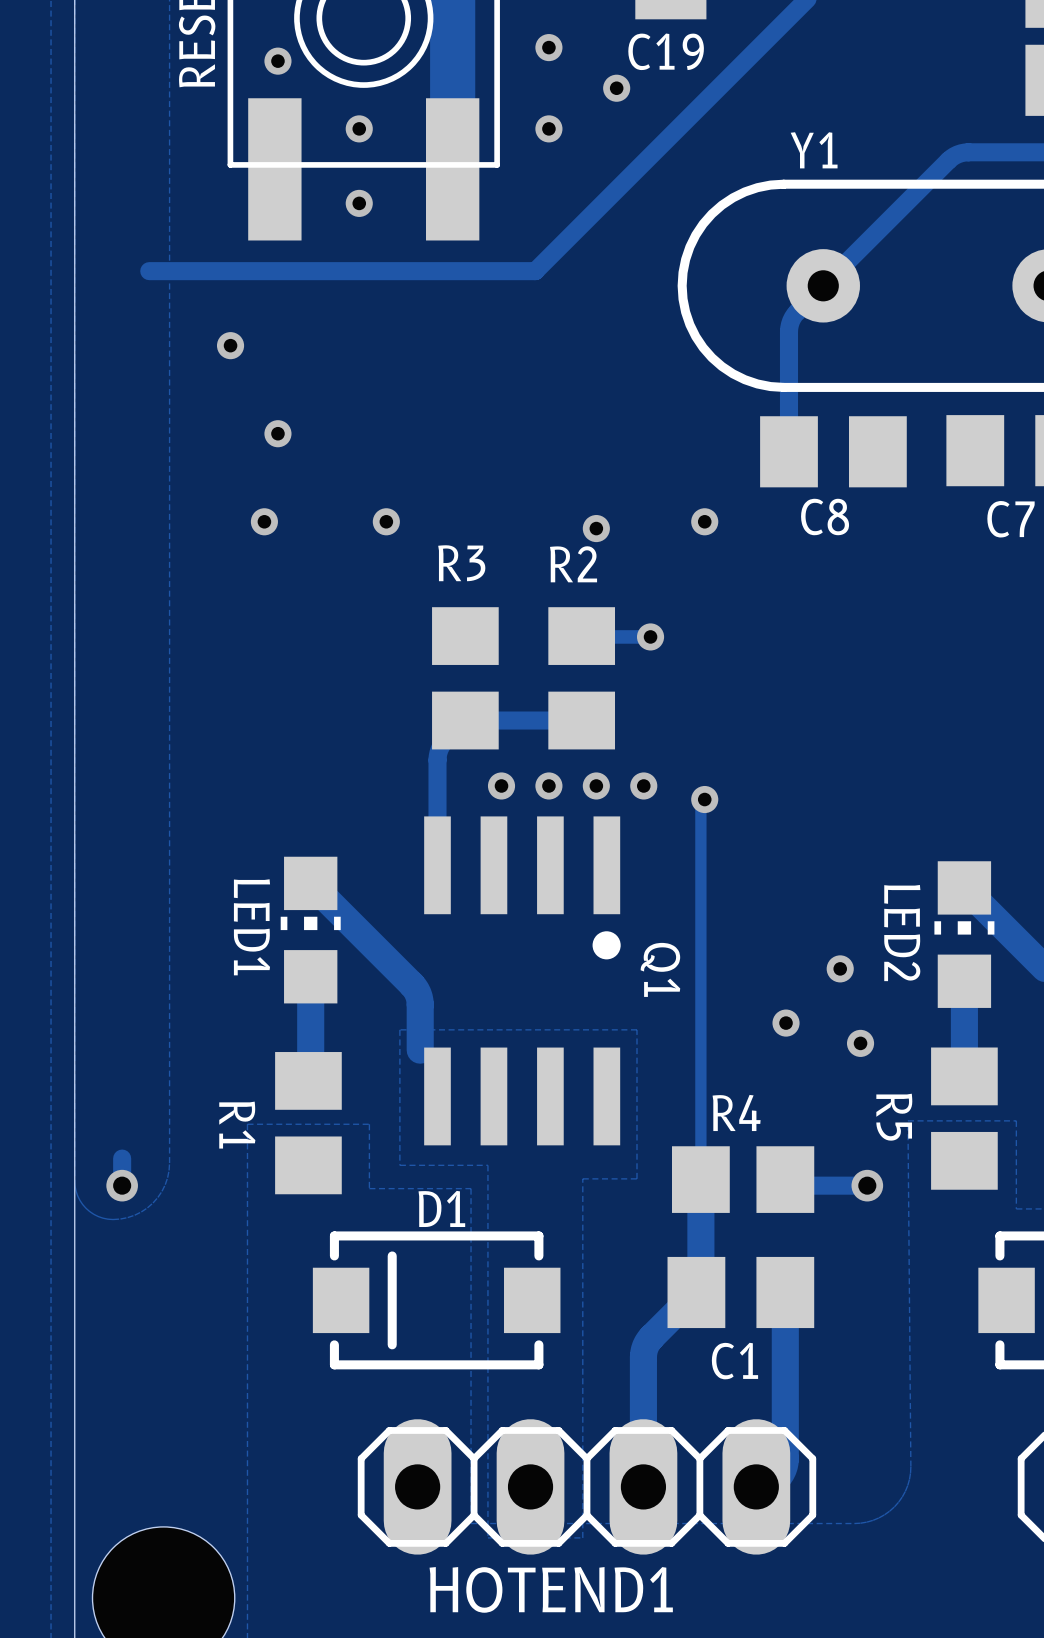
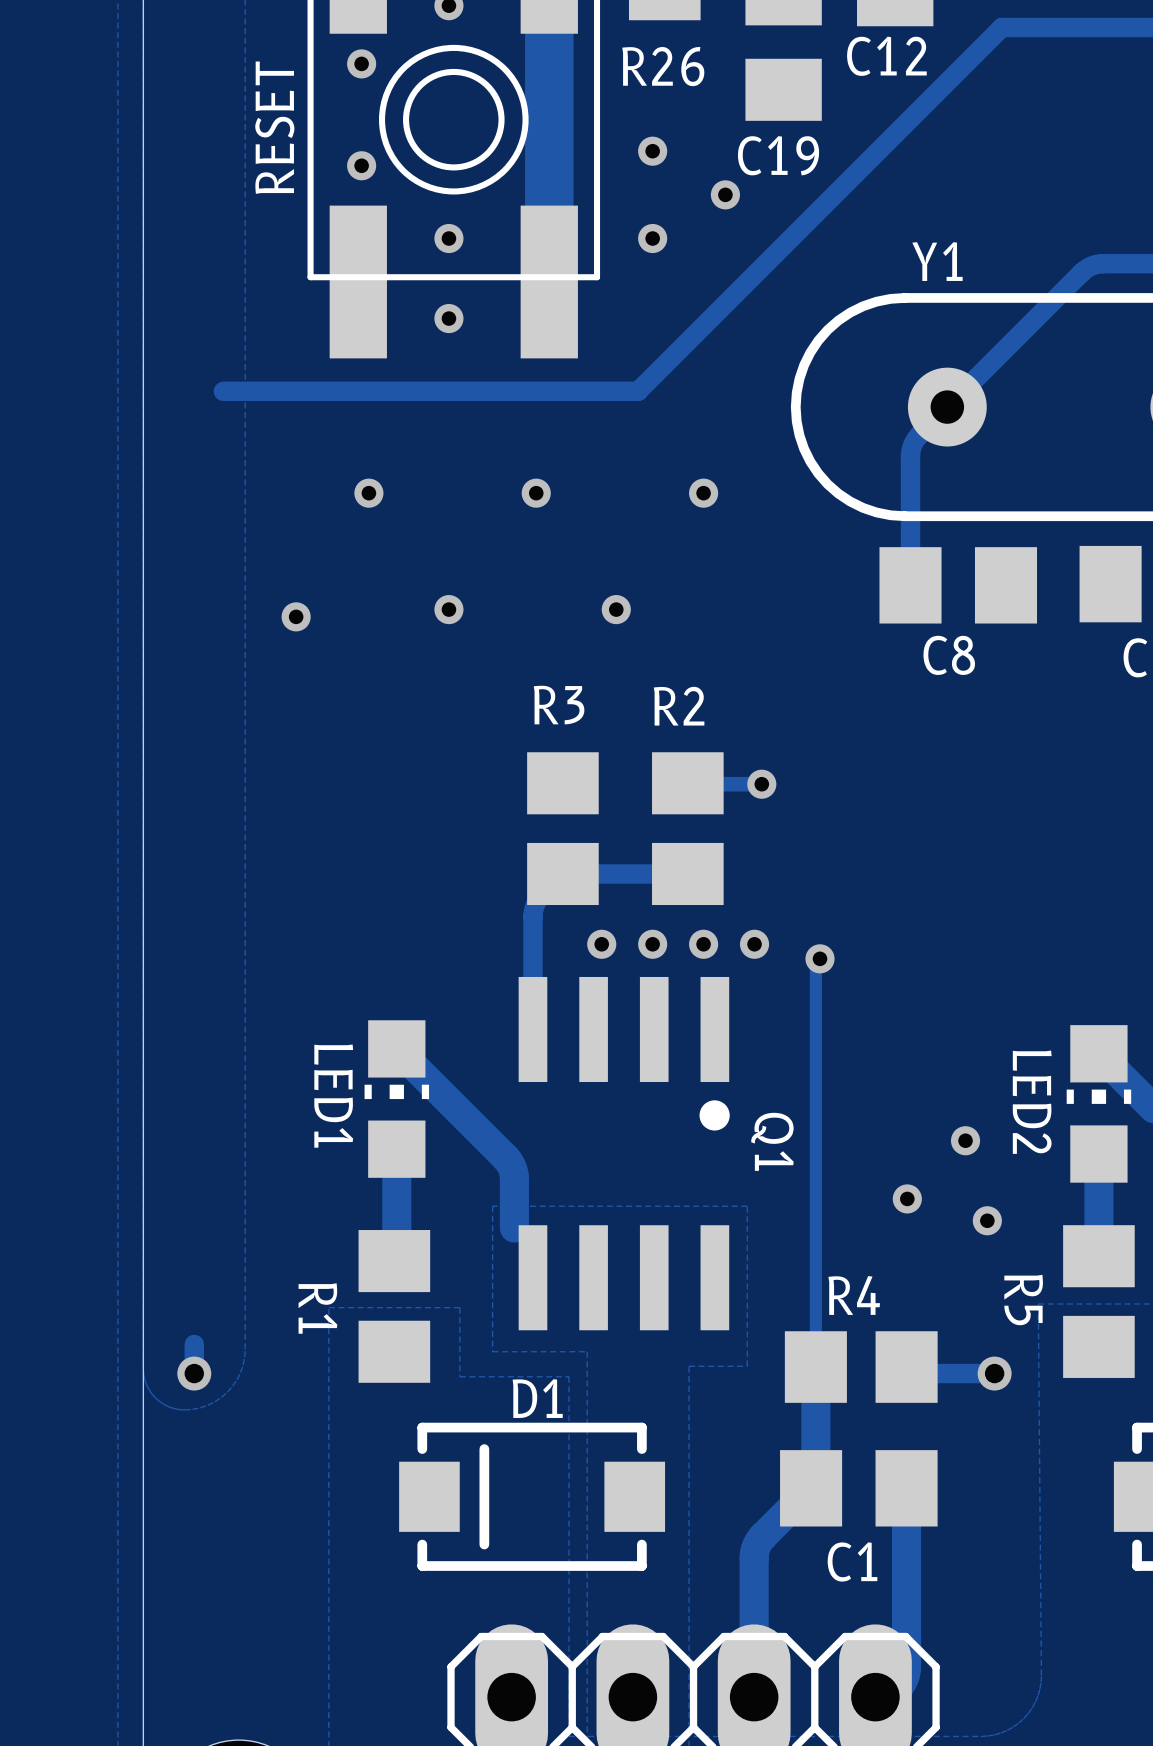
via: (230, 345) -> none
via: none -> (368, 493)
via: none -> (536, 493)
via: none -> (703, 493)
via: (277, 433) -> none
via: none -> (448, 609)
via: none -> (616, 609)
via: none -> (296, 616)
via: (264, 521) -> none
via: (386, 521) -> none
via: (704, 521) -> none
via: (596, 528) -> none

